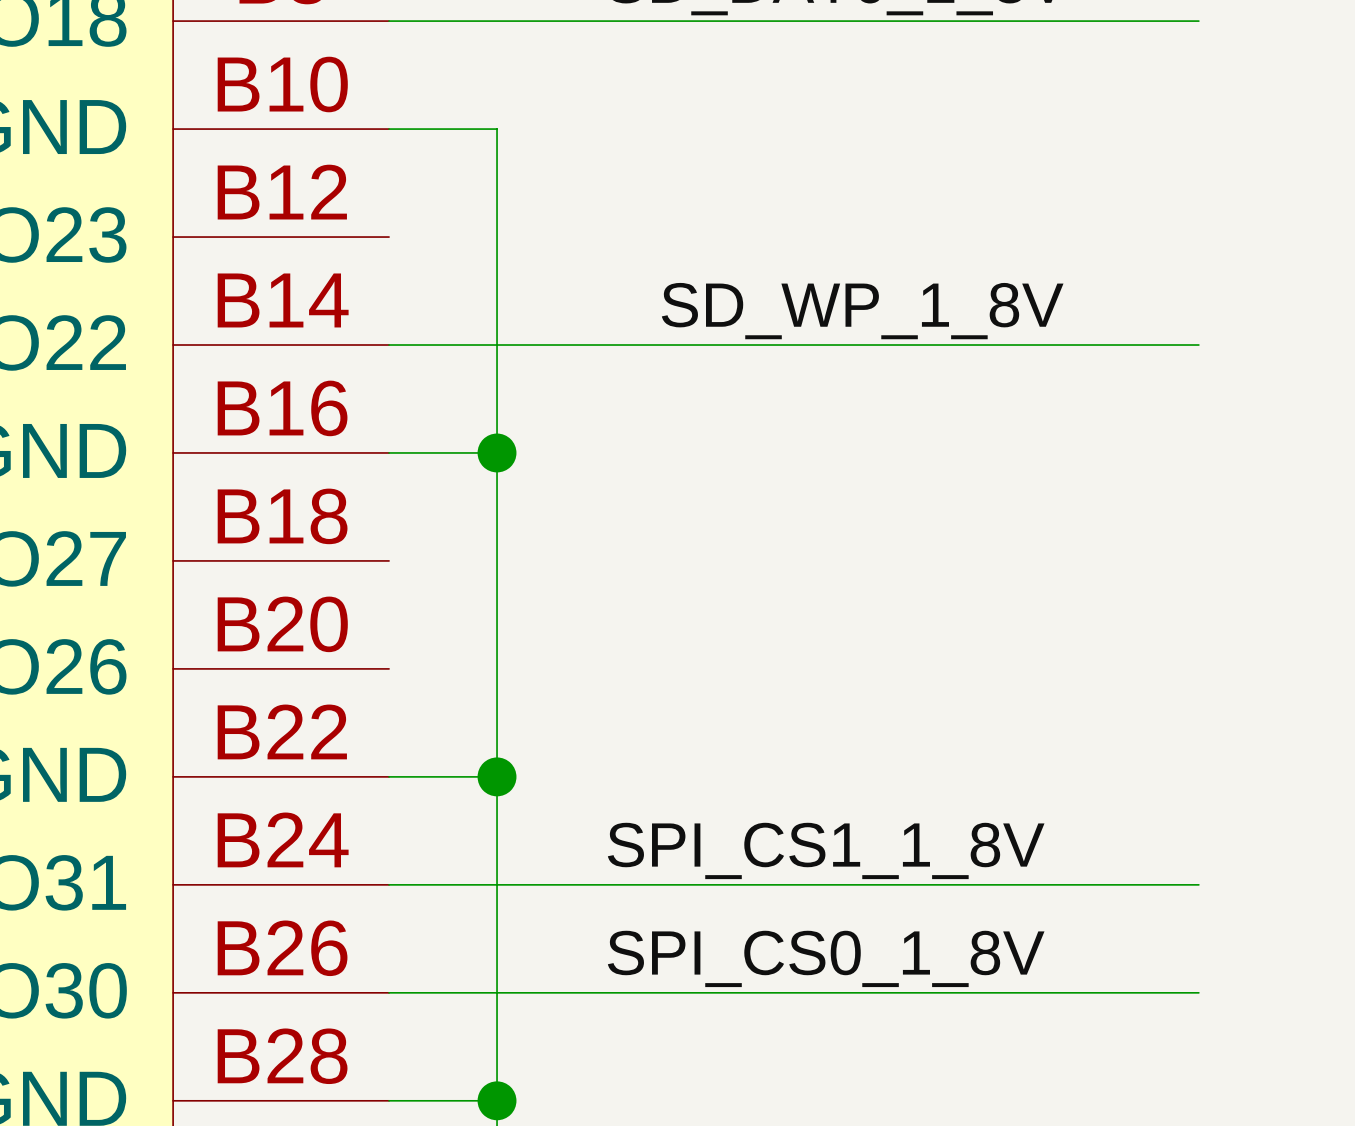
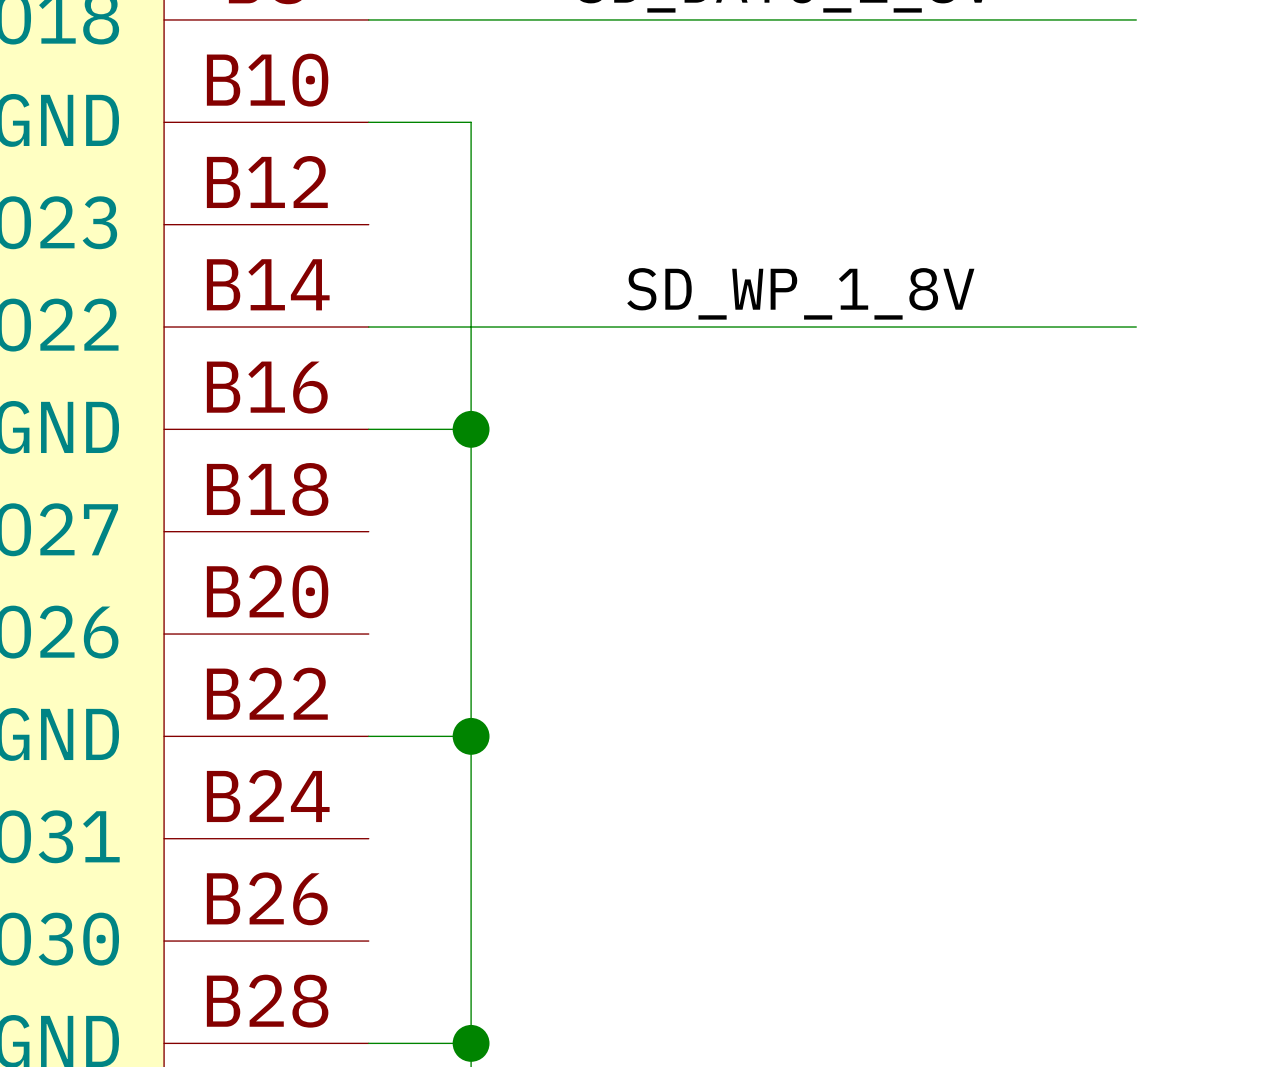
label: SPI_CS1_1_8V (826, 850) -> none
wire: (389, 884) (1198, 884) -> none
label: SPI_CS0_1_8V (826, 958) -> none
wire: (389, 992) (1198, 992) -> none

